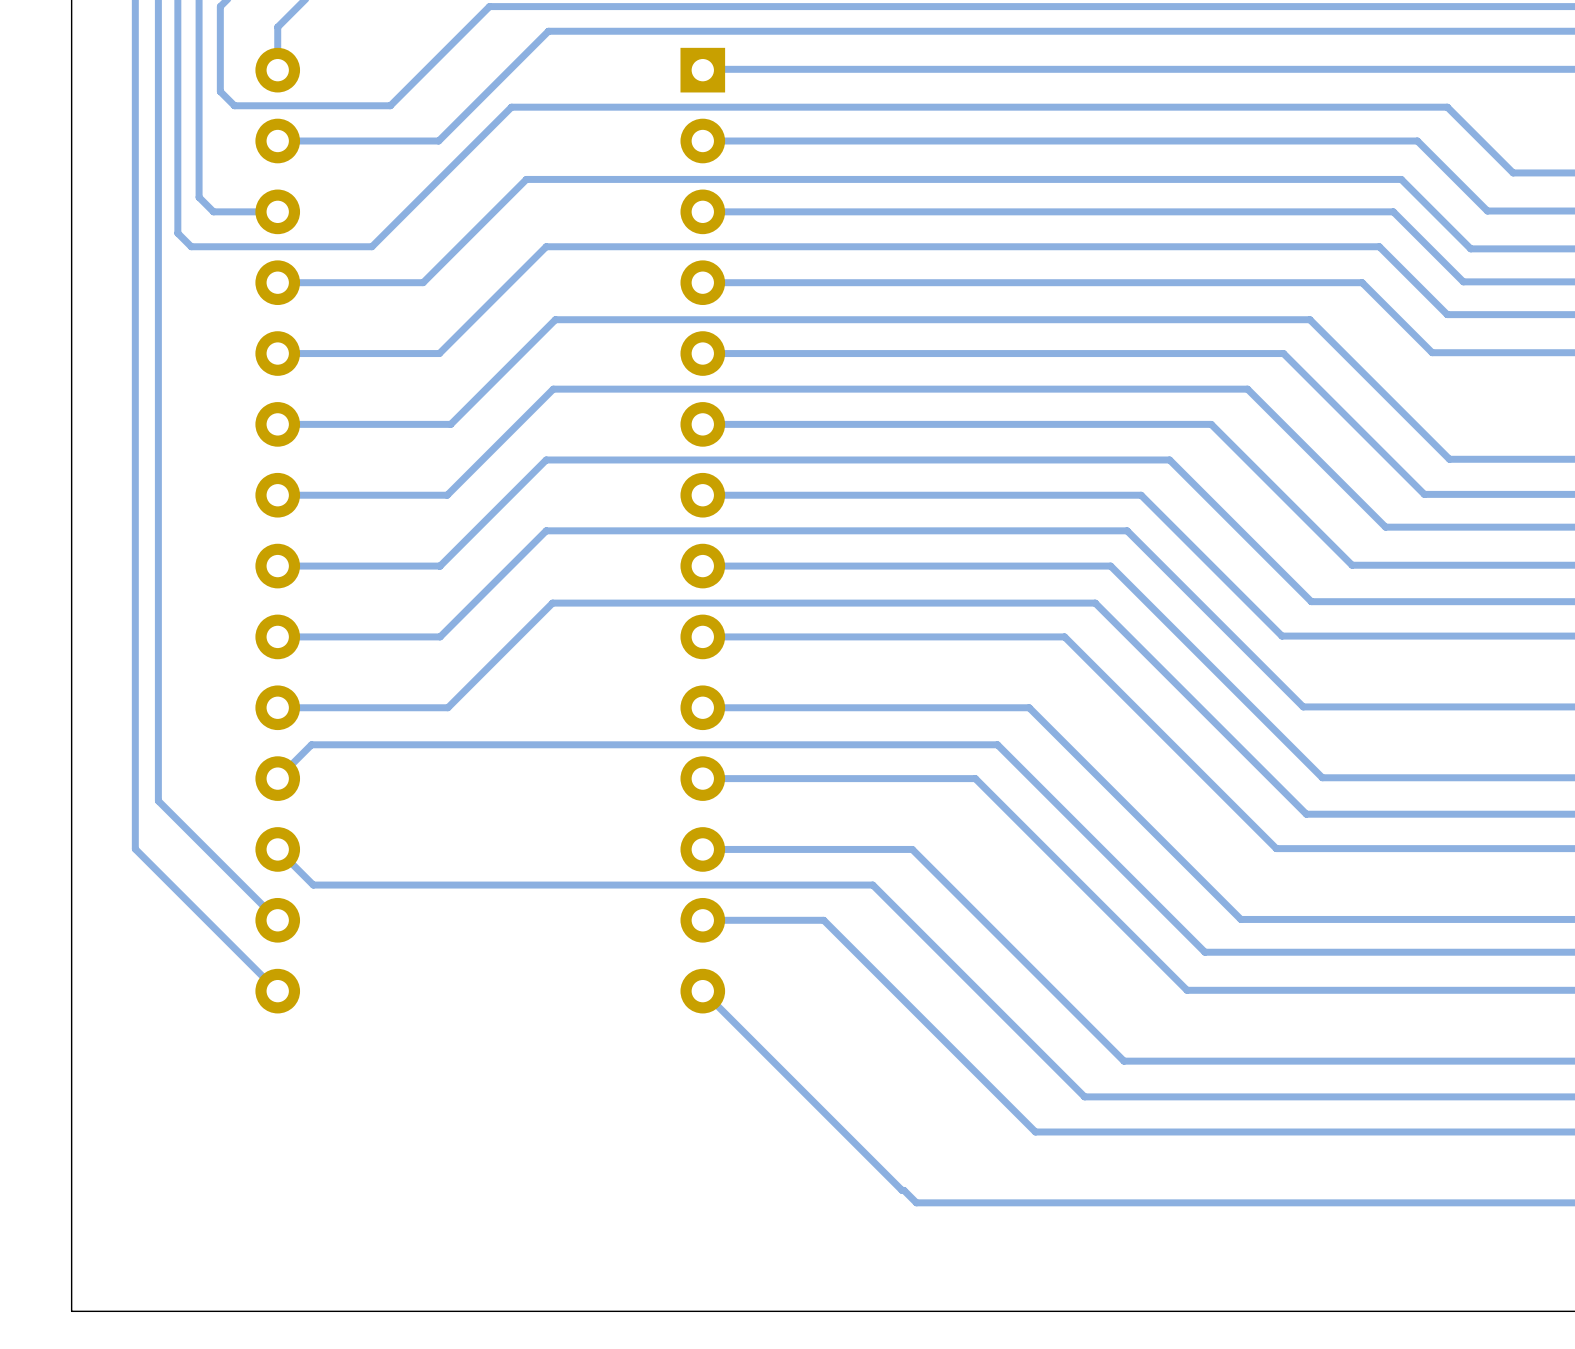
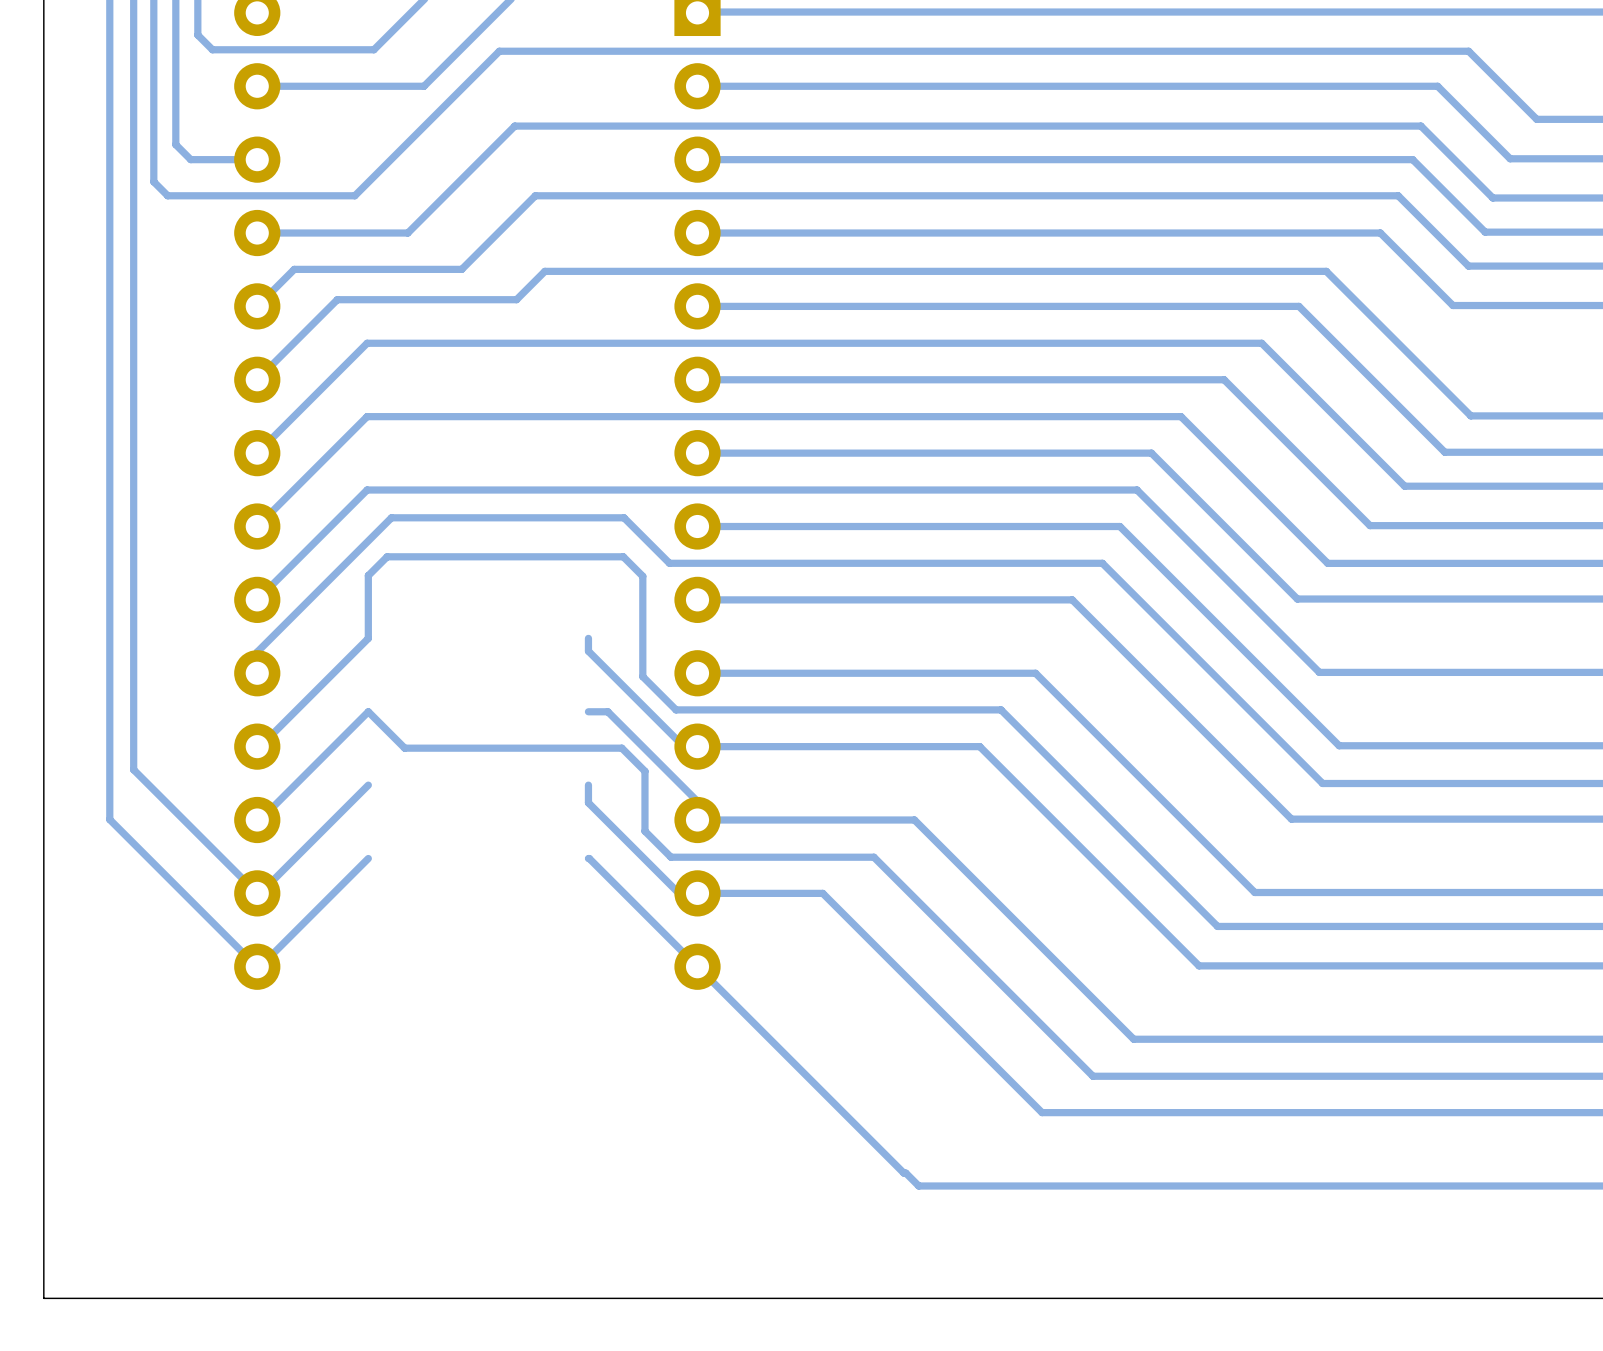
bottom track: (475, 317) (439, 353) (277, 353) -> (461, 269) (294, 269) (257, 306)
bottom track: (528, 347) (450, 424) (277, 424) -> (516, 299) (337, 299) (257, 379)
bottom track: (553, 389) (447, 495) (277, 495) -> (542, 343) (367, 343) (257, 453)
bottom track: (546, 459) (439, 566) -> none
bottom track: (546, 530) (440, 636) (277, 636) -> (535, 490) (367, 490) (257, 599)
bottom track: (439, 566) (277, 566) -> (535, 416) (367, 416) (257, 526)
bottom track: (1095, 603) (552, 603) (447, 707) (277, 707) -> (1103, 564) (1102, 563) (669, 563) (624, 517) (391, 517) (257, 652) (257, 673)
bottom track: none -> (588, 638) (588, 651) (683, 746) (697, 746)
bottom track: none -> (588, 711) (607, 711) (697, 801) (697, 820)
bottom track: (997, 744) (311, 744) (277, 778) -> (1002, 711) (1001, 709) (676, 709) (642, 676) (642, 576) (623, 556) (387, 556) (368, 575) (368, 638) (260, 746) (257, 746)
bottom track: none -> (368, 785) (260, 893) (257, 893)
bottom track: none -> (588, 785) (588, 802) (678, 893) (697, 893)
bottom track: (277, 849) (313, 885) (872, 885) -> (257, 820) (260, 820) (368, 711) (404, 748) (621, 748) (644, 771) (644, 831) (670, 857) (873, 857)
bottom track: none -> (368, 858) (260, 966) (257, 966)
bottom track: none -> (588, 858) (697, 966)

